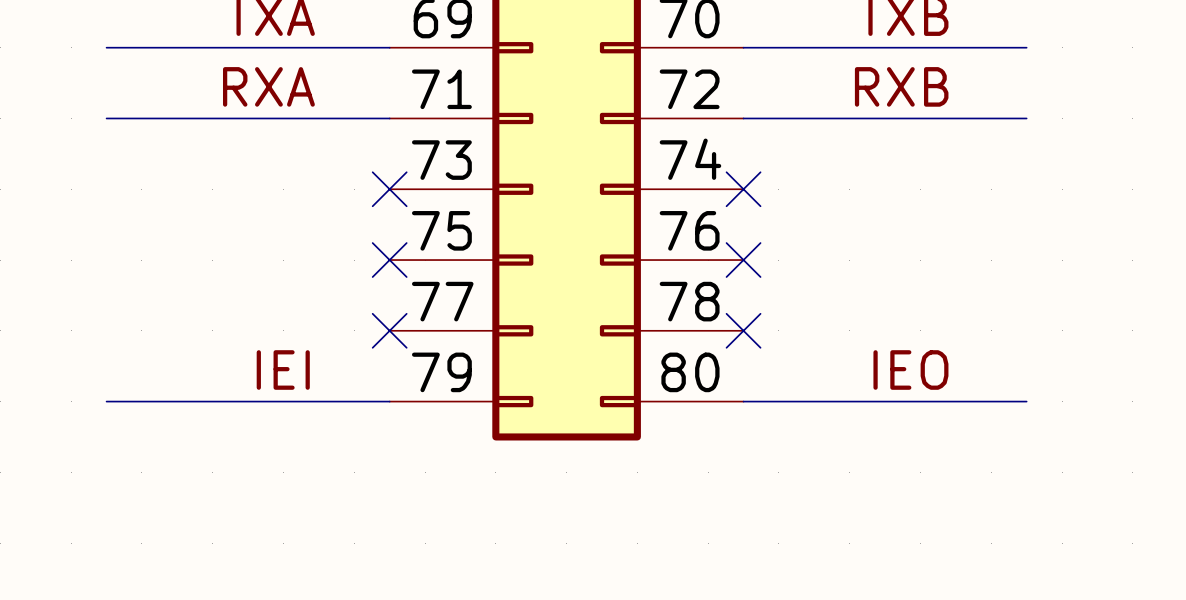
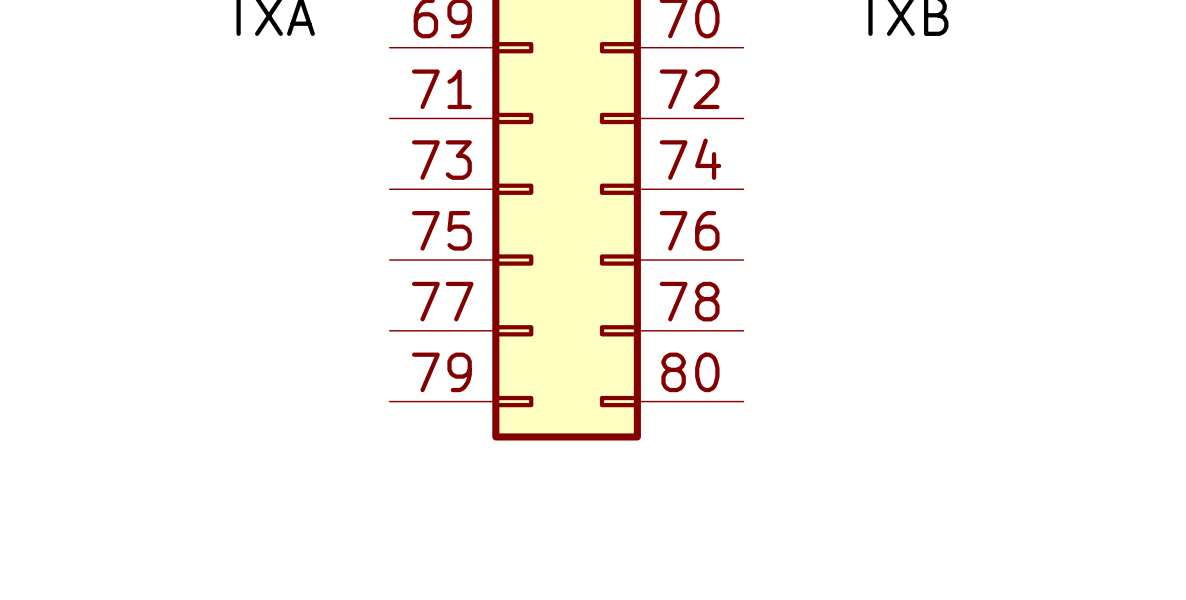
wire: (106, 47) (389, 47) -> none
wire: (743, 47) (1026, 47) -> none
label: RXA (268, 86) -> none
label: RXB (901, 86) -> none
wire: (106, 118) (389, 118) -> none
wire: (743, 118) (1026, 118) -> none
no-connect mark: (389, 189) -> none
no-connect mark: (743, 189) -> none
no-connect mark: (389, 260) -> none
no-connect mark: (743, 260) -> none
no-connect mark: (389, 330) -> none
no-connect mark: (743, 330) -> none
label: IEI (283, 369) -> none
label: IEO (910, 369) -> none
wire: (106, 401) (389, 401) -> none
wire: (743, 401) (1026, 401) -> none

